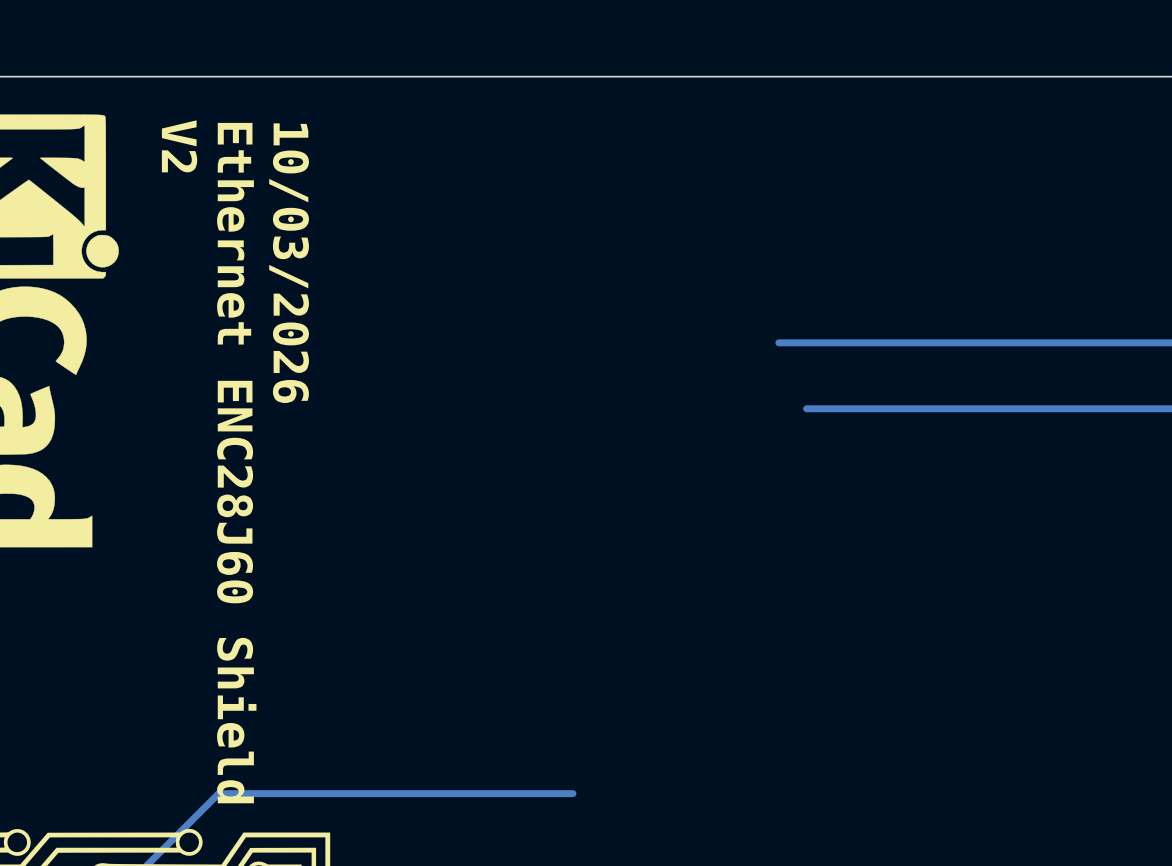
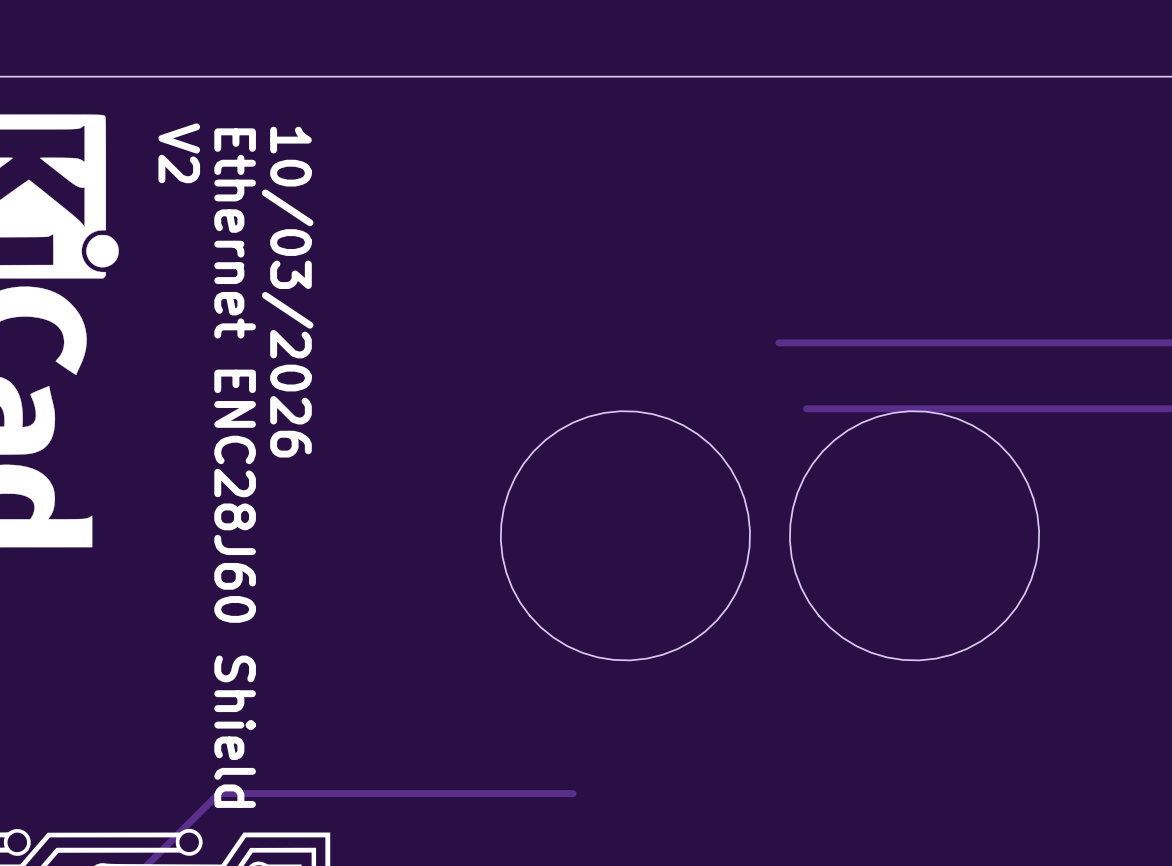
board edge: none -> (529, 615) (540, 627) (567, 646) (598, 657) (614, 659) (646, 658) (662, 654) (692, 641) (705, 631) (717, 620) (735, 593) (742, 578) (749, 547) (750, 530) (744, 498) (730, 469) (721, 455) (697, 433) (683, 425) (668, 418) (636, 411) (620, 411) (588, 416) (573, 422) (545, 440) (523, 463) (515, 477) (503, 508) (501, 524) (502, 557) (506, 572) (512, 588) (529, 615)
board edge: none -> (818, 615) (829, 627) (856, 646) (871, 652) (903, 659) (919, 660) (951, 654) (981, 641) (994, 631) (1016, 607) (1024, 593) (1031, 578) (1038, 547) (1039, 530) (1033, 498) (1019, 469) (1010, 455) (999, 444) (972, 425) (941, 414) (925, 411) (909, 411) (877, 416) (847, 430) (834, 440) (822, 451) (804, 477) (797, 492) (790, 524) (789, 540) (795, 572) (809, 602) (818, 615)

